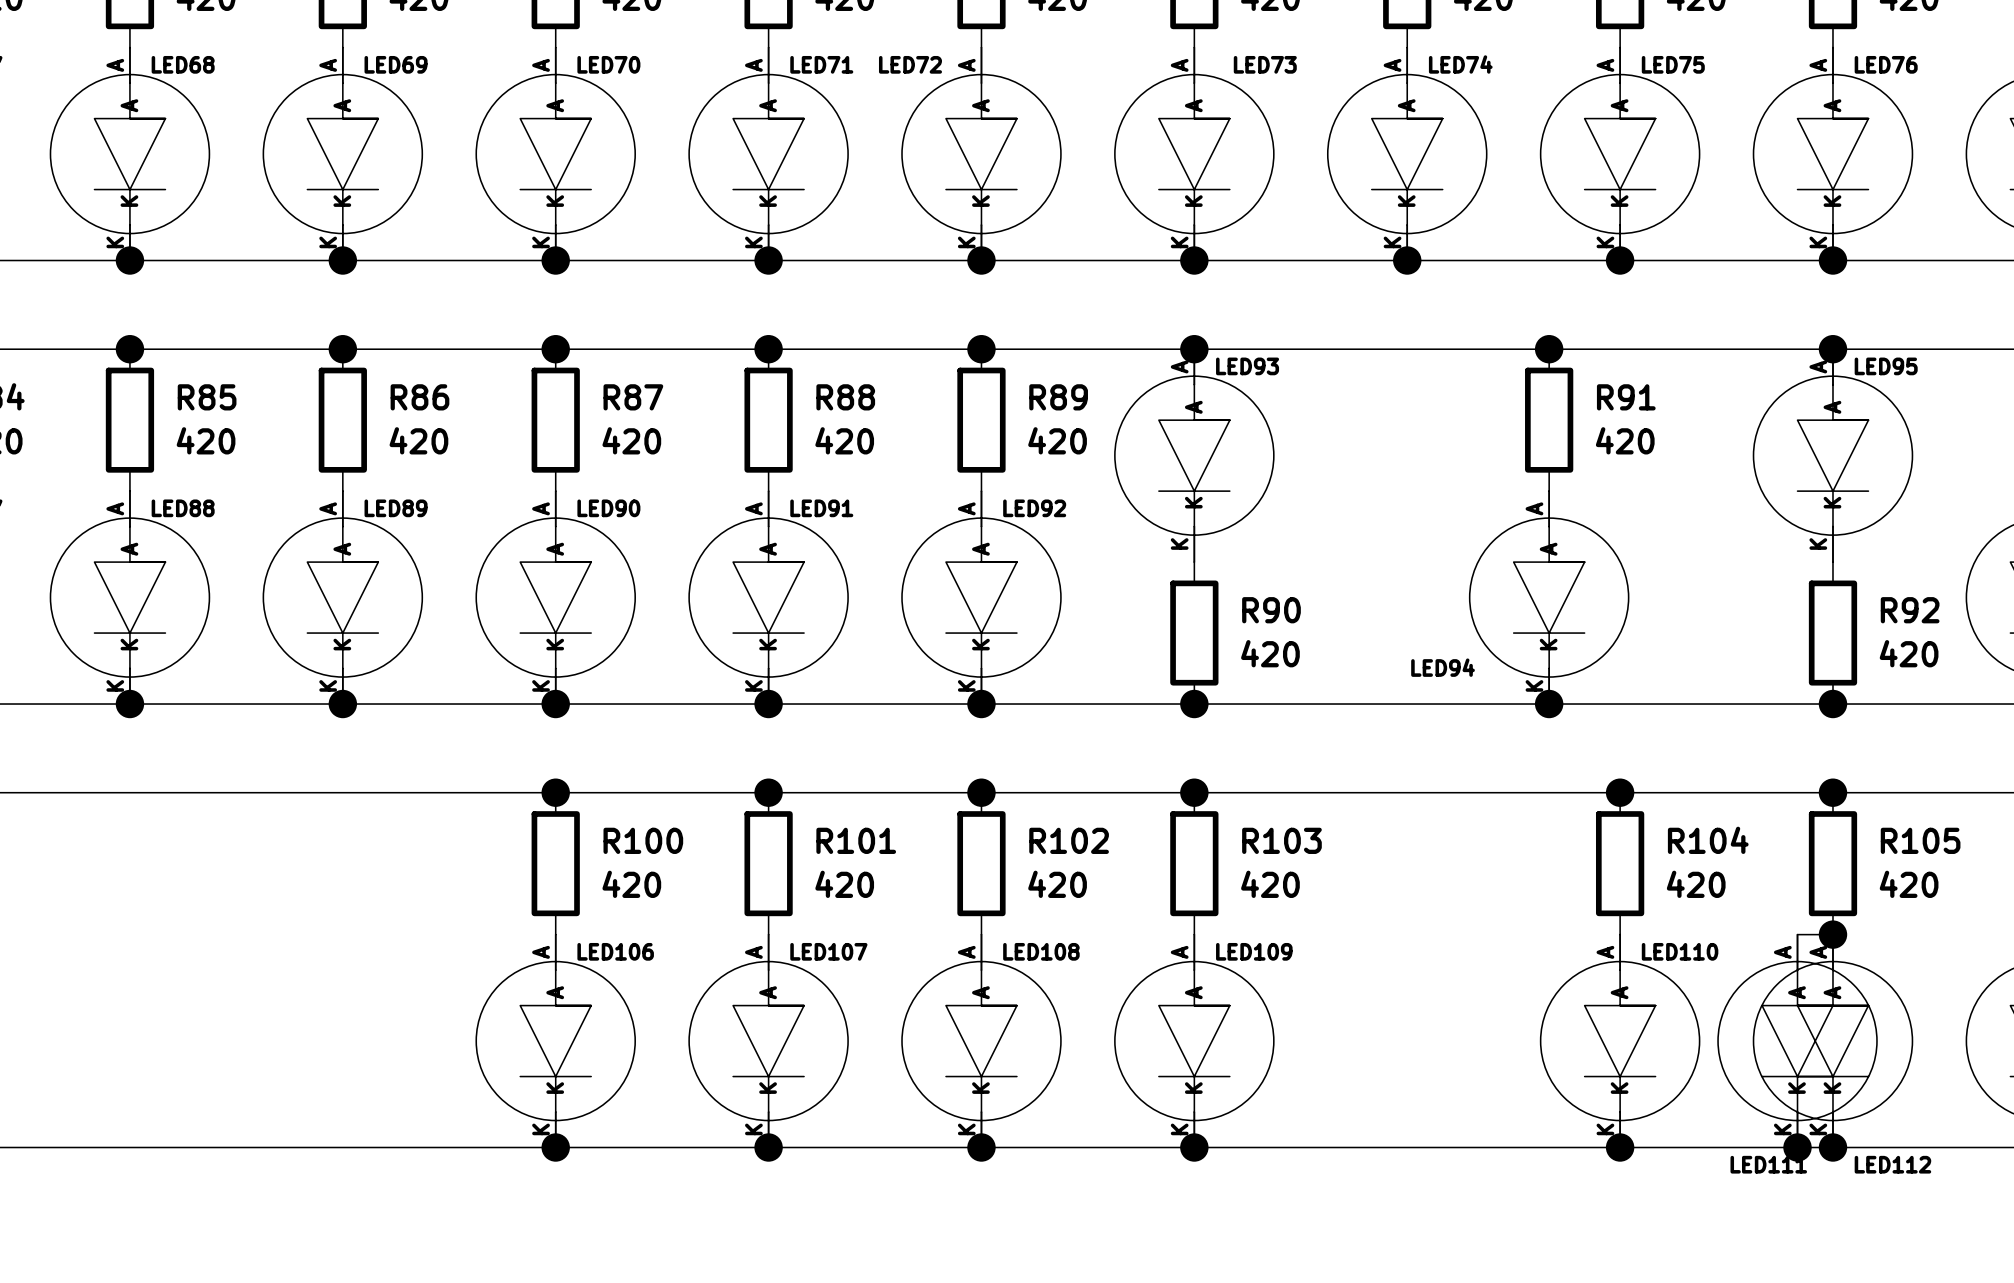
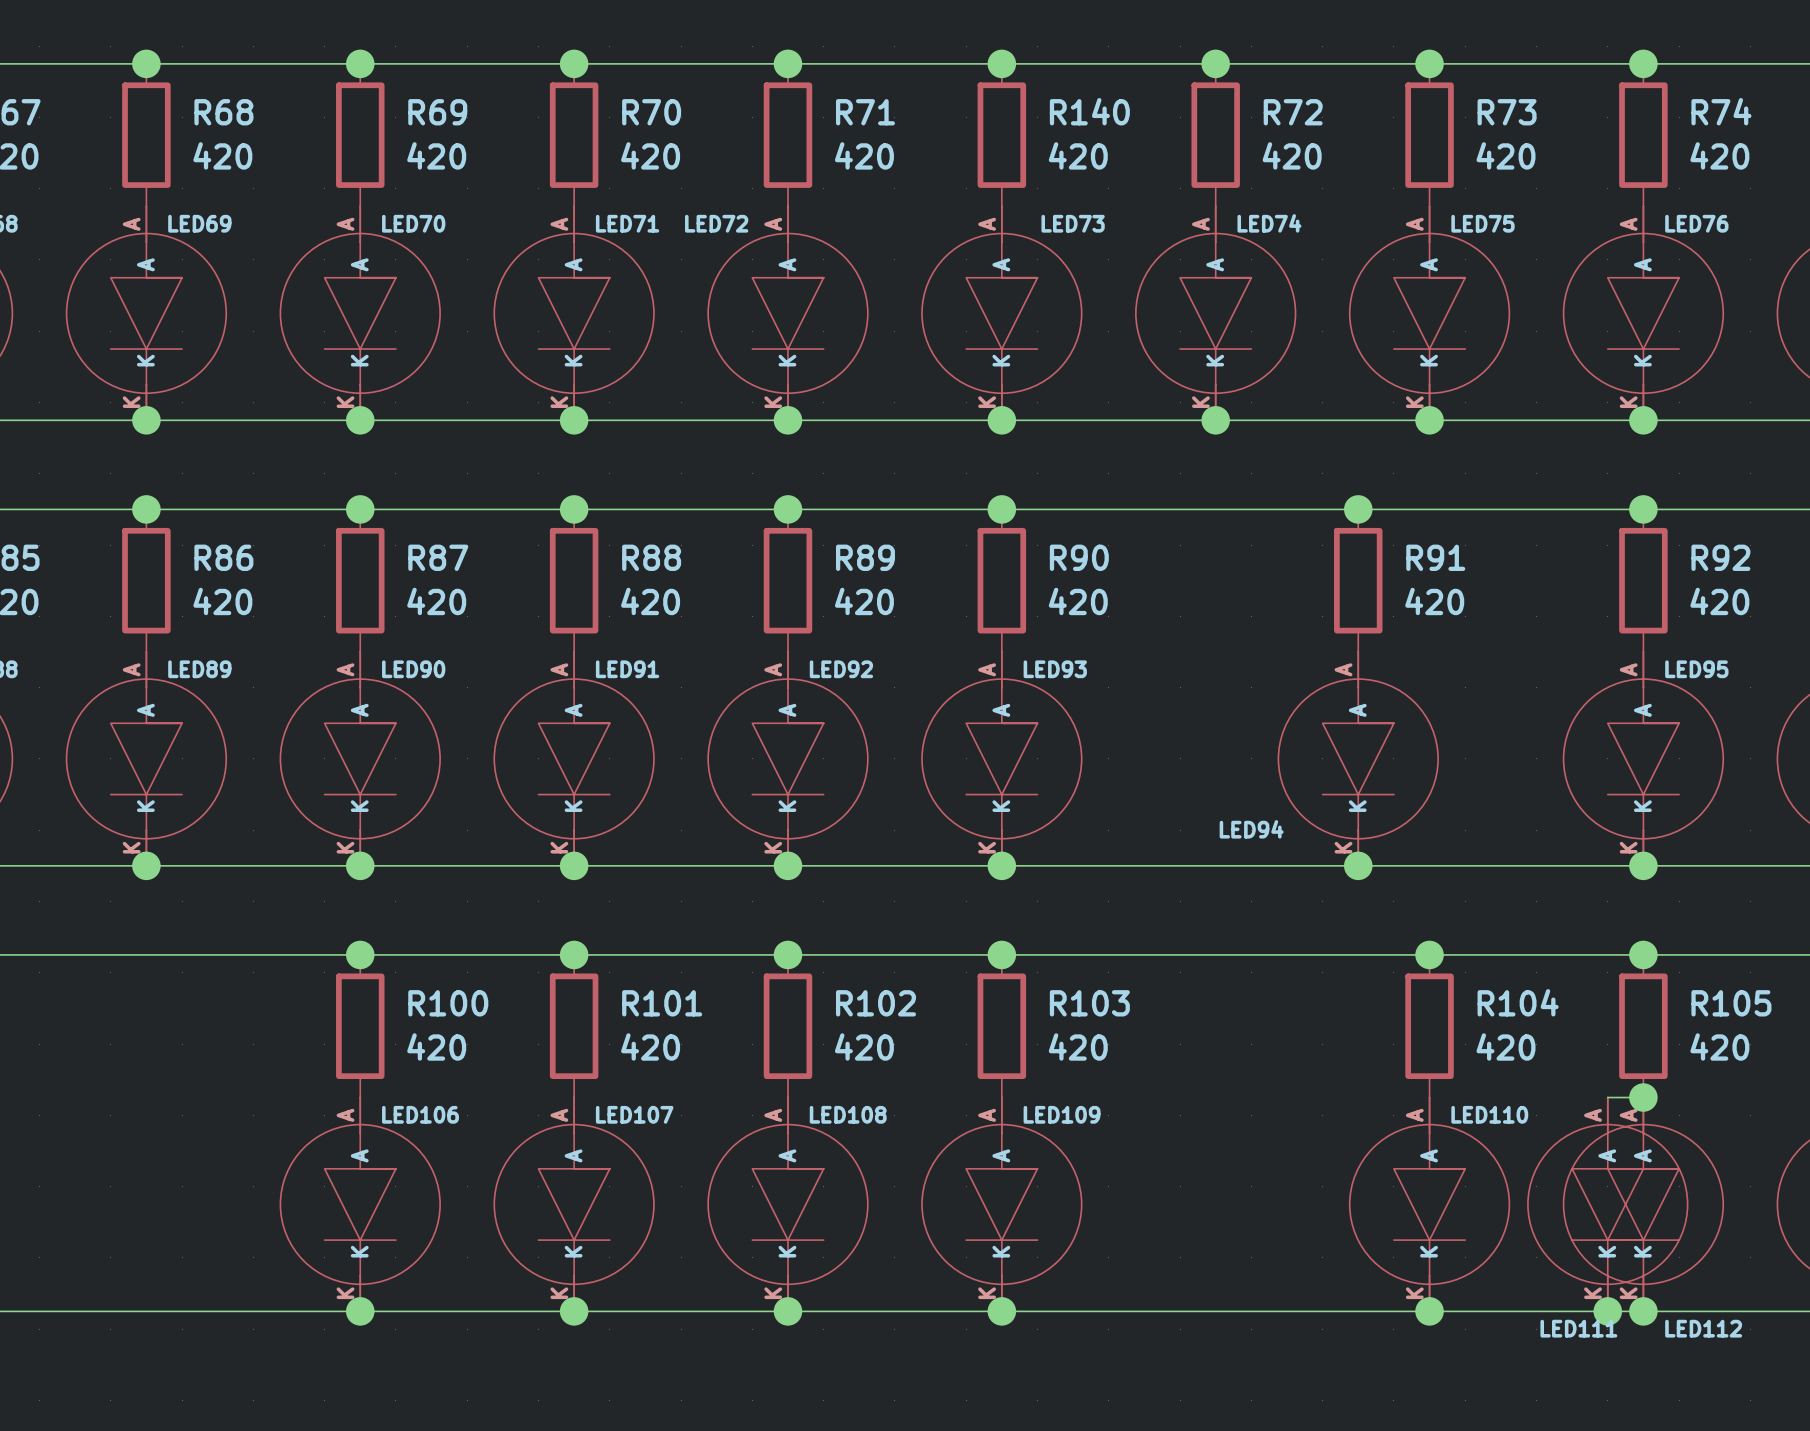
LED93 position: (1194, 455) -> (1001, 758)
LED95 position: (1832, 455) -> (1643, 758)
R90 position: (1194, 633) -> (1001, 580)
R92 position: (1832, 633) -> (1643, 580)

